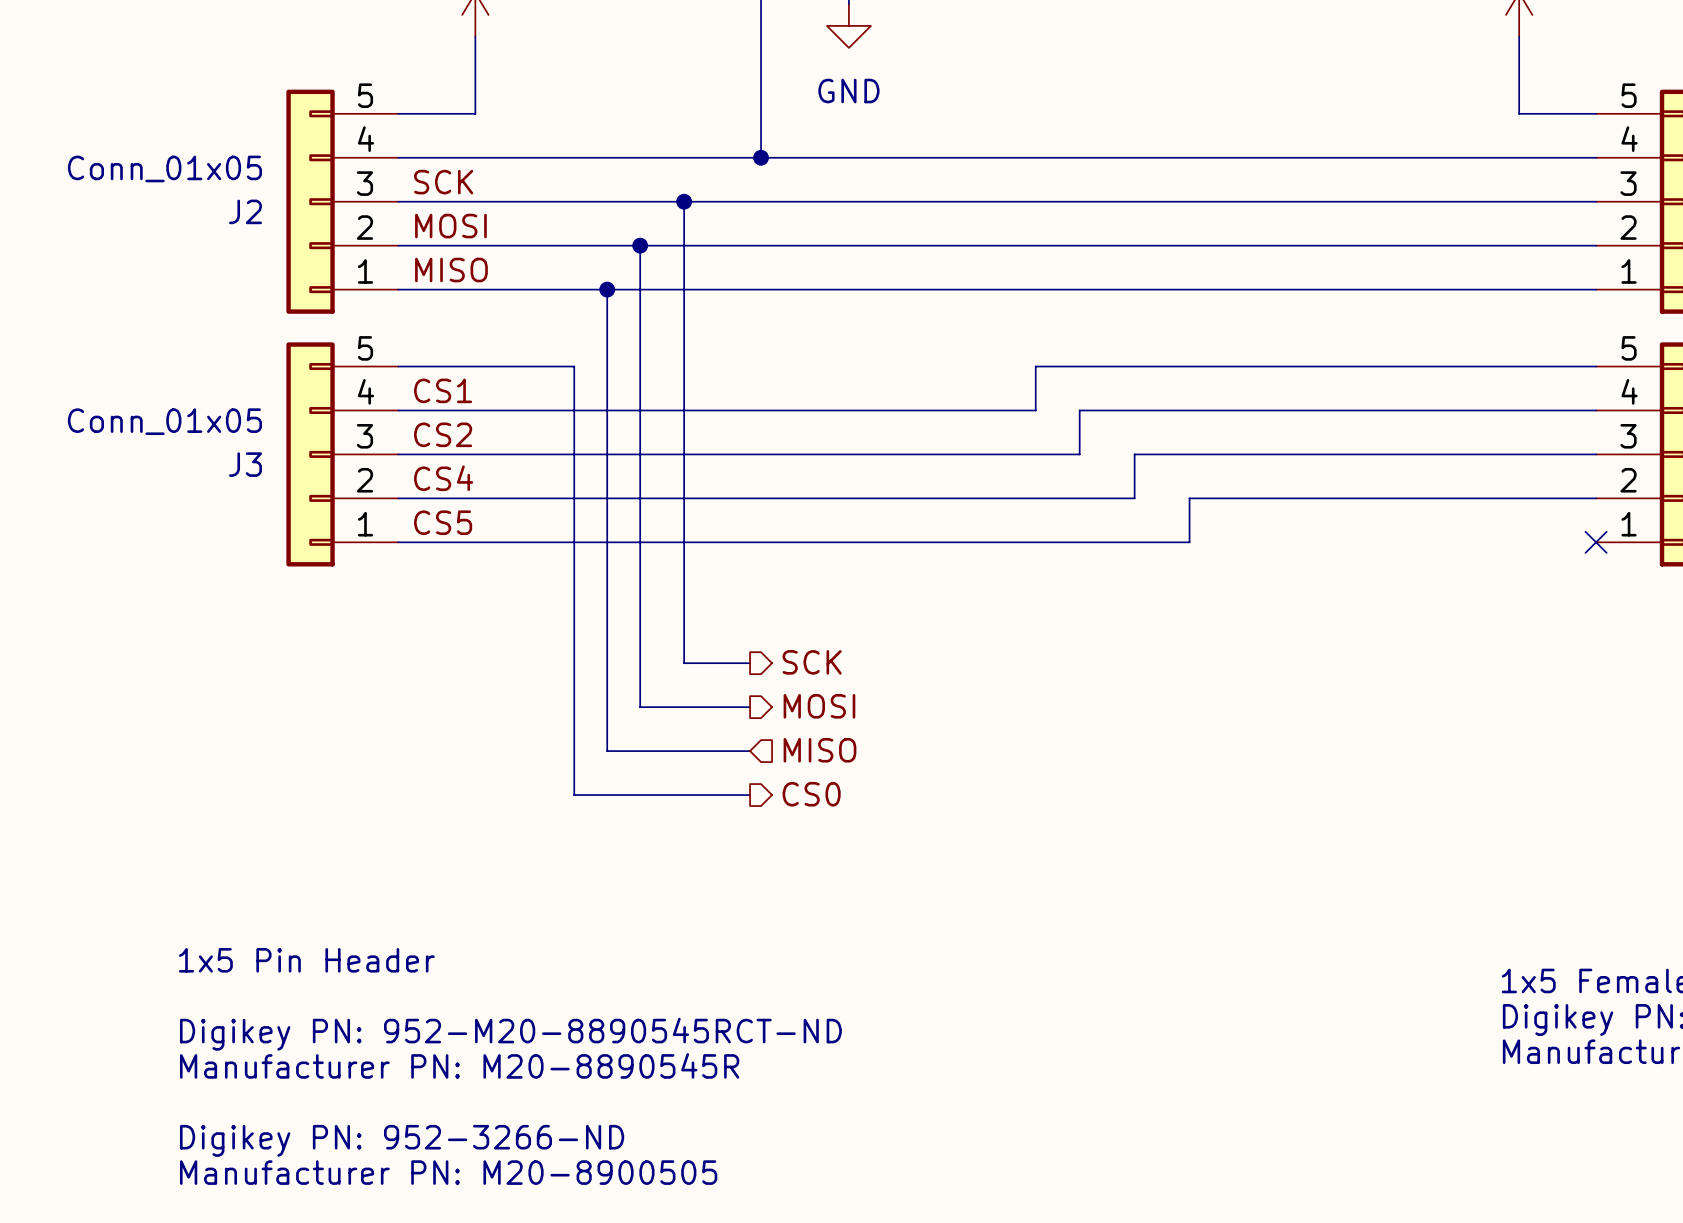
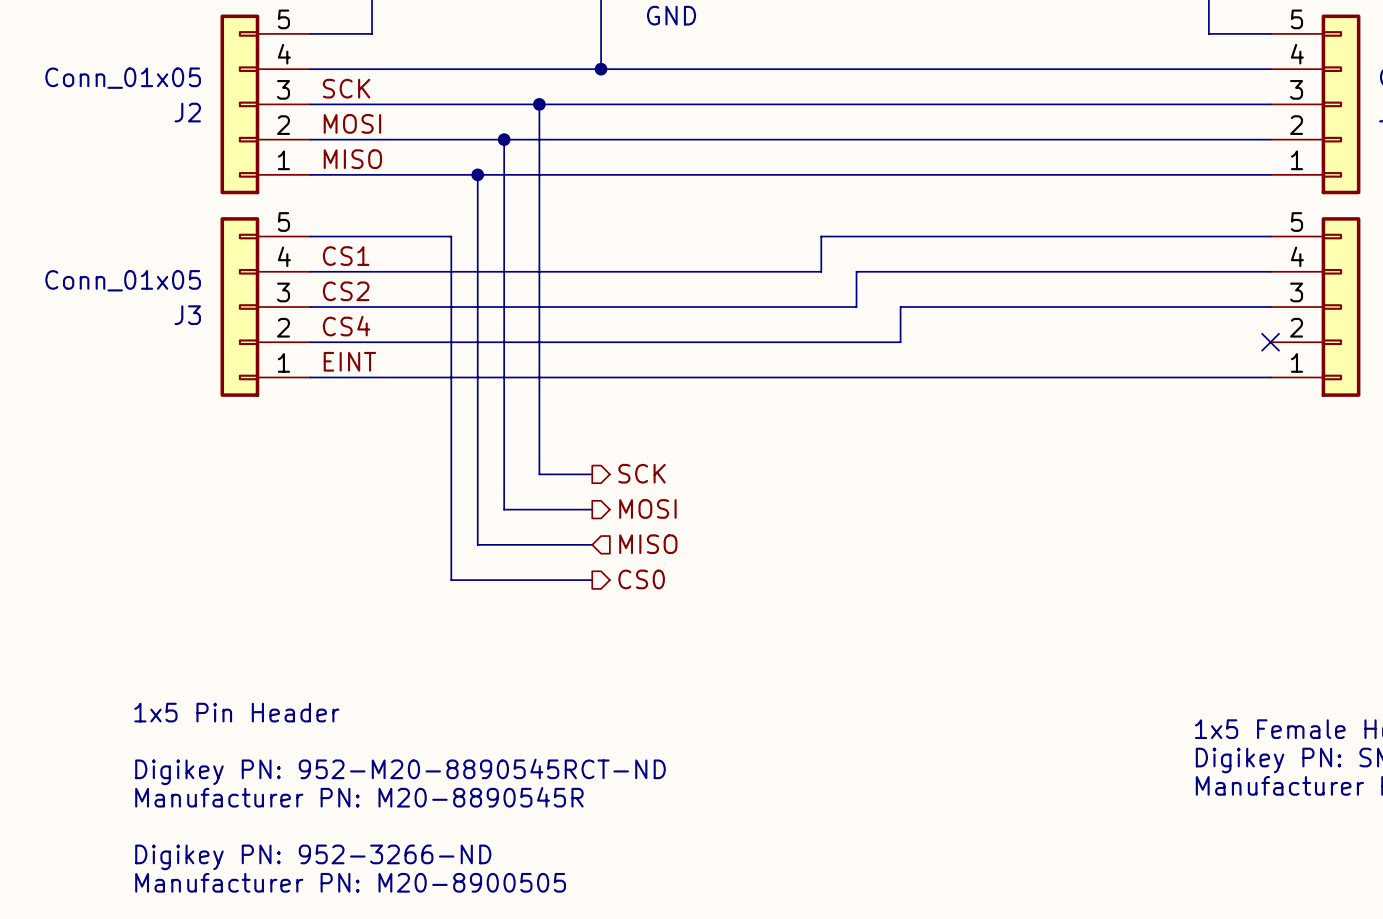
wire: (1596, 498) (1189, 498) (1189, 542) -> (1270, 377) (944, 377)
label: CS5 (443, 522) -> EINT (349, 361)
no-connect mark position: (1596, 542) -> (1270, 342)

